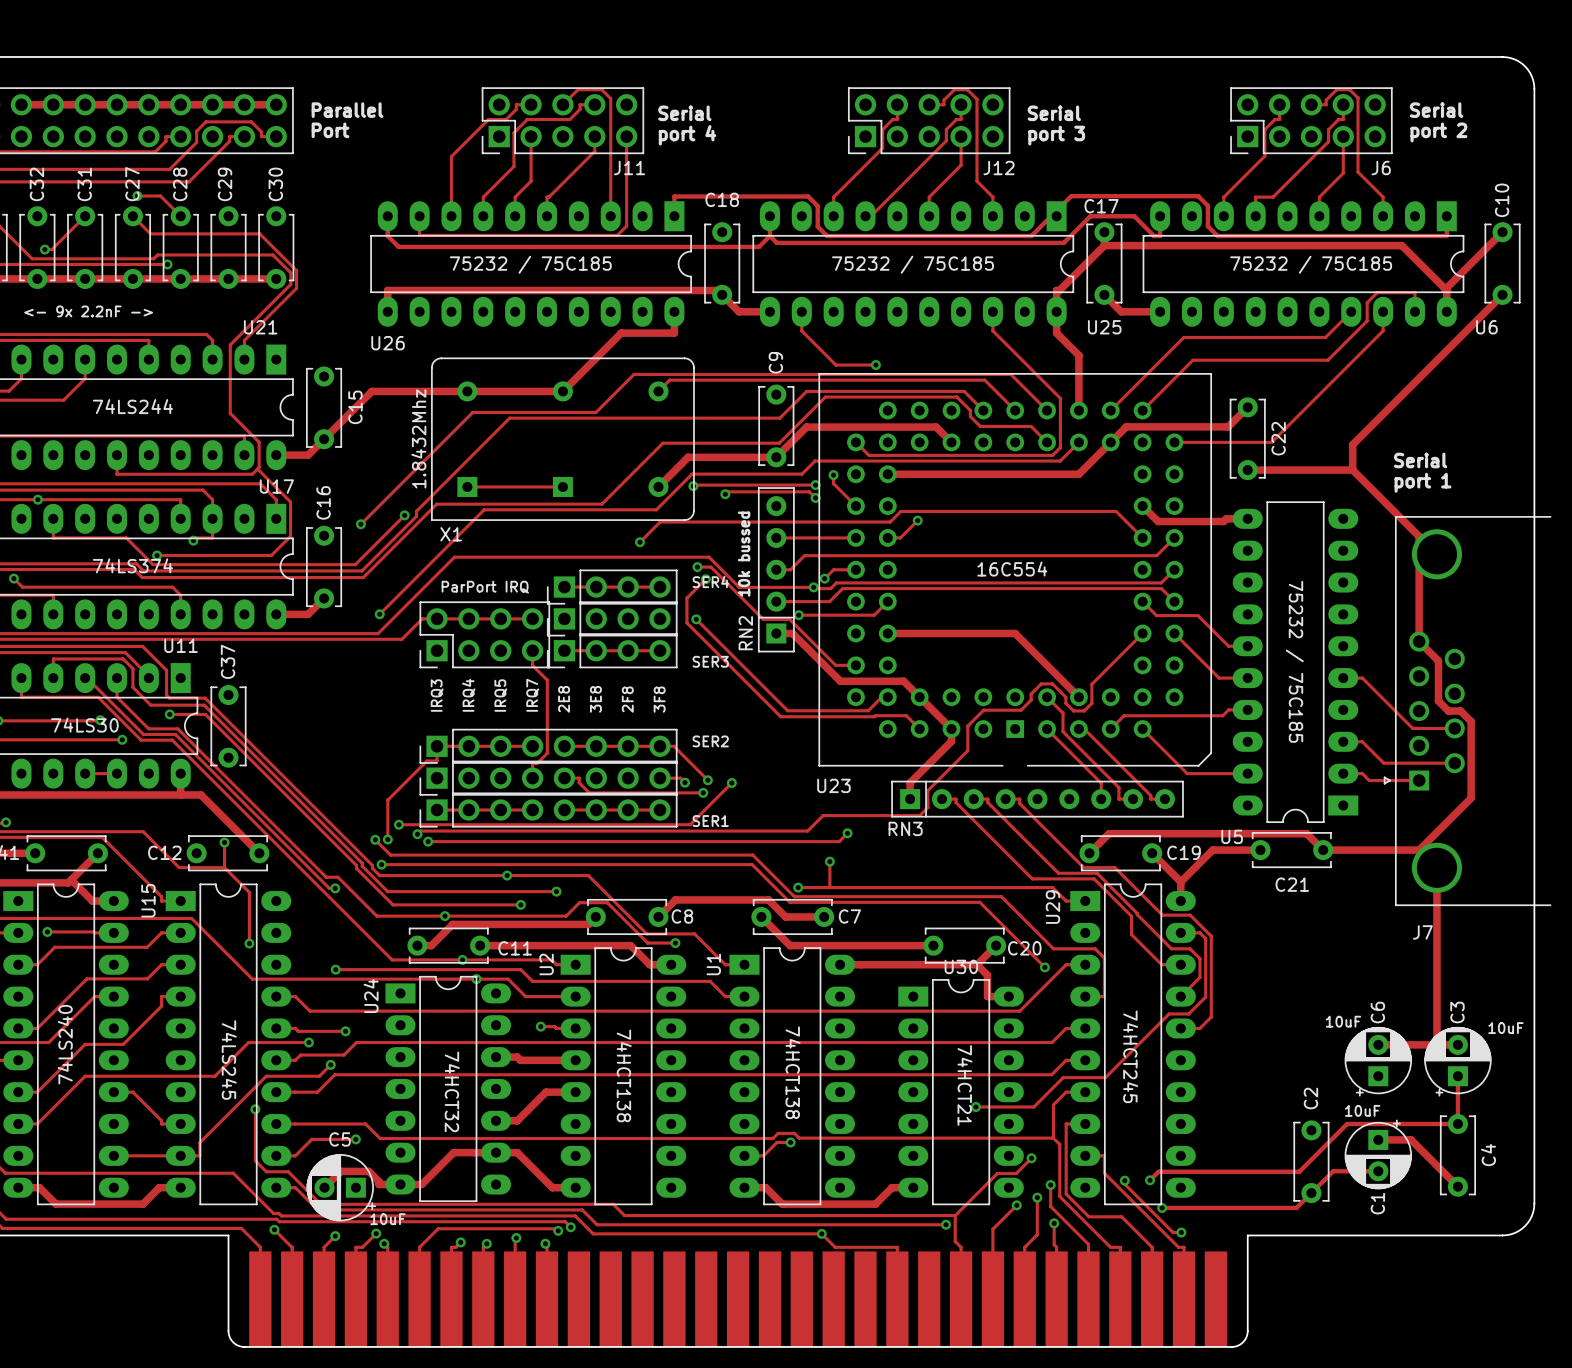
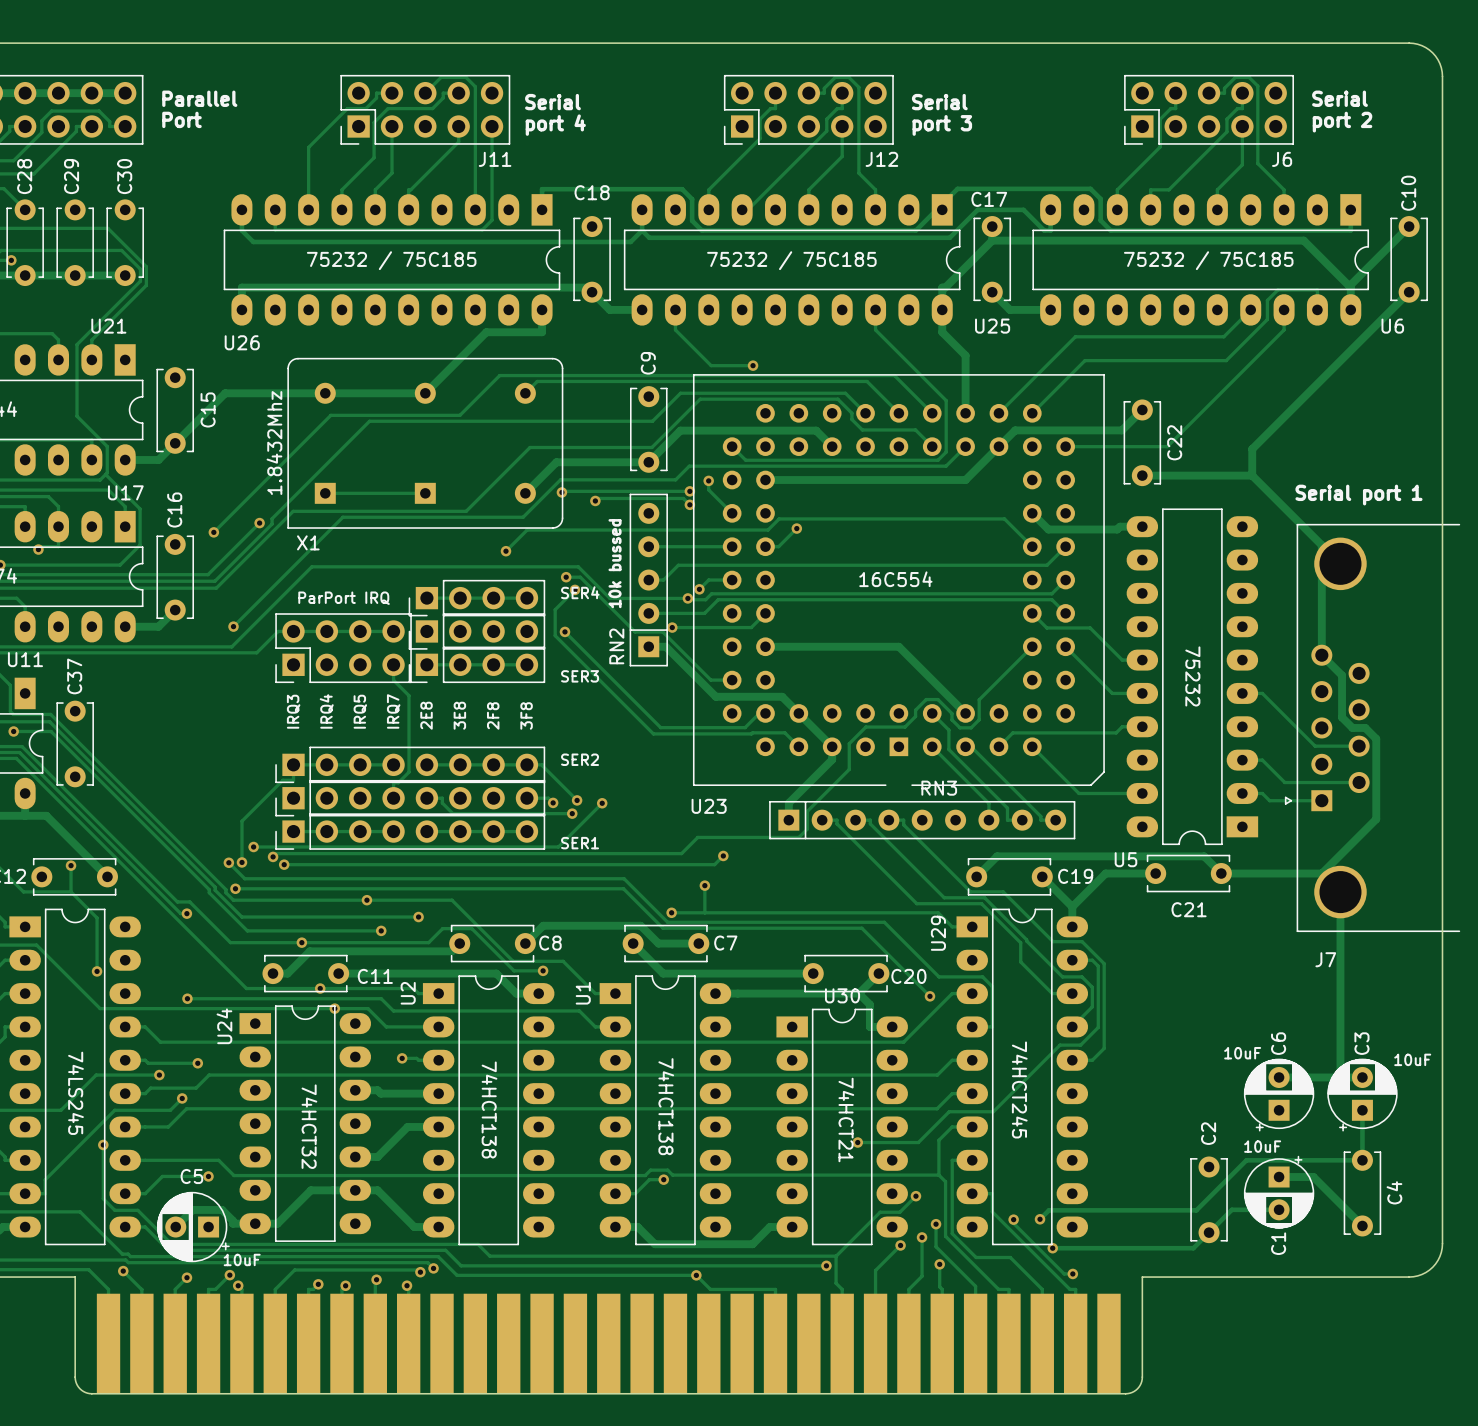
text: Serial (1420, 460) -> none
text: port 1 (1422, 482) -> Serial port 1 (1358, 495)
text: 75232 / 75C185 (1294, 661) -> 75232 (1192, 676)
RN3 name position: RN3 (905, 828) -> RN3 (939, 788)

